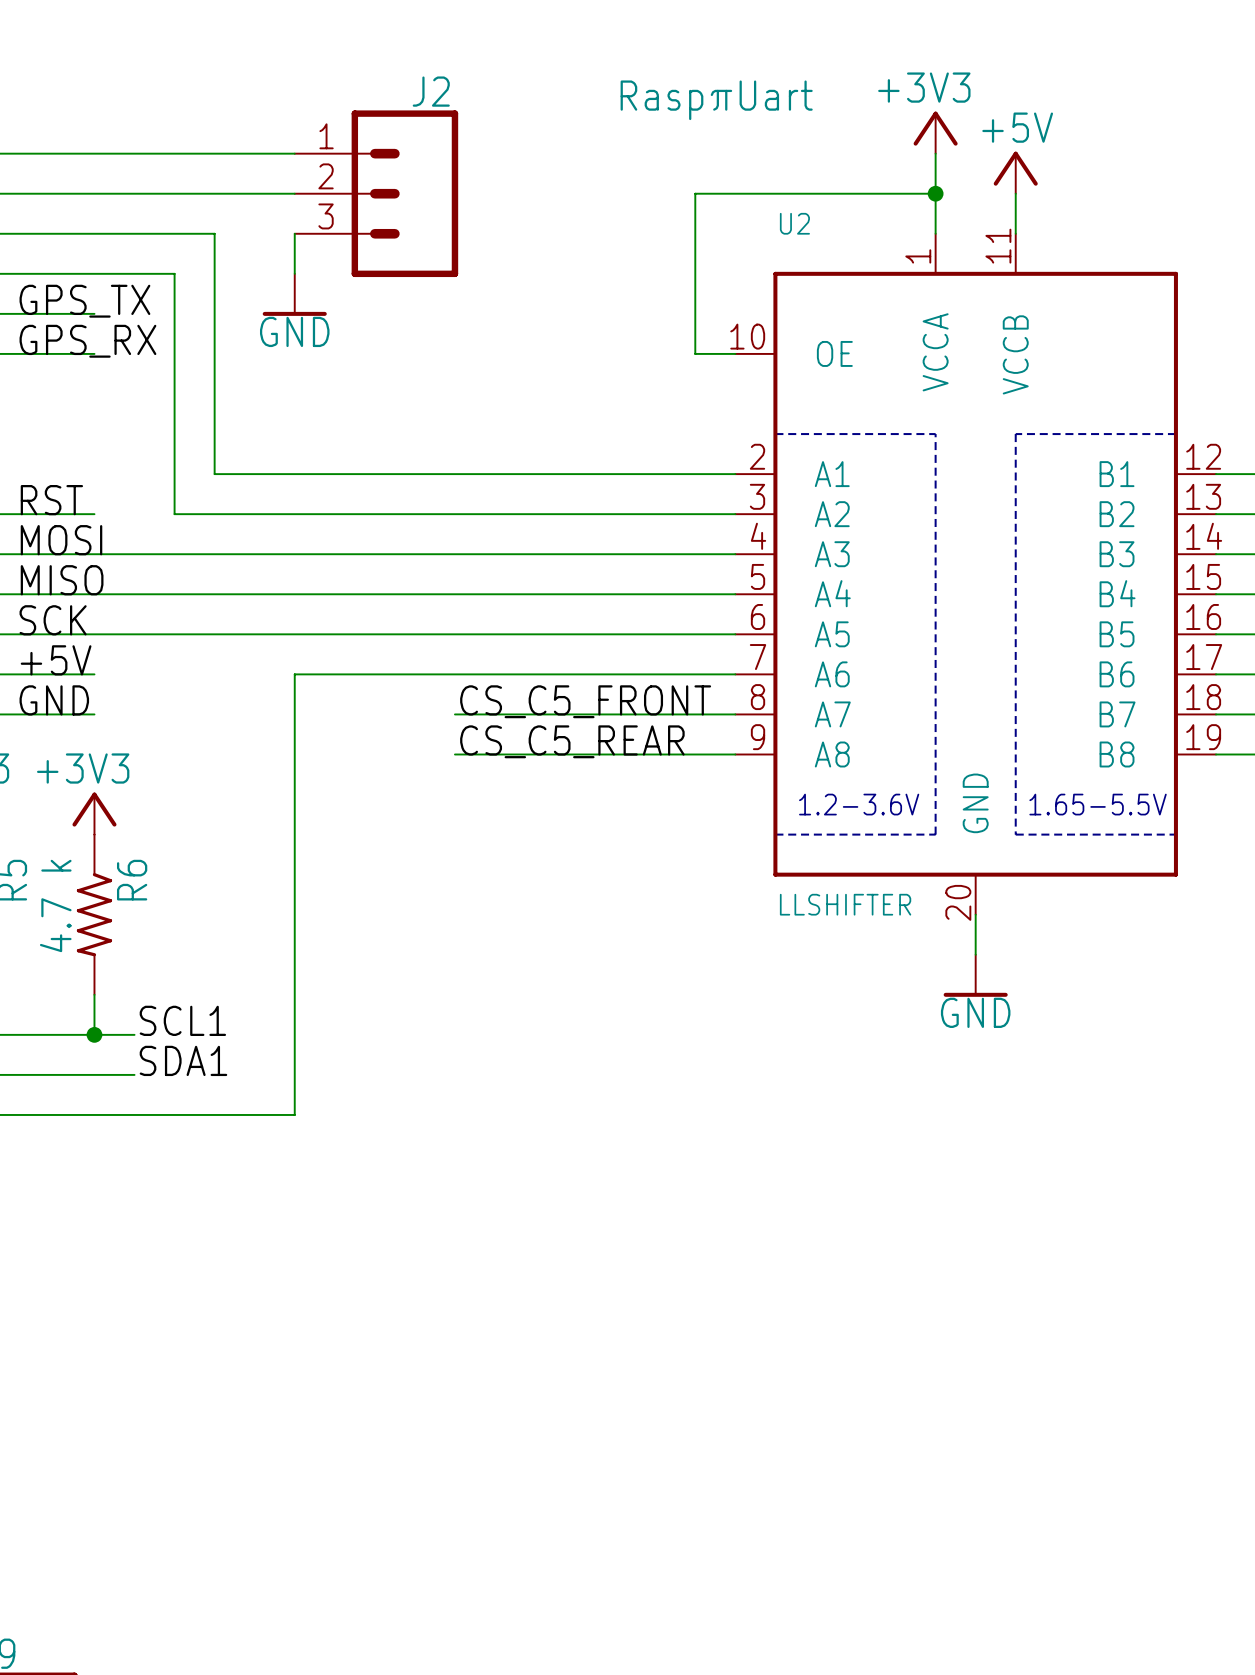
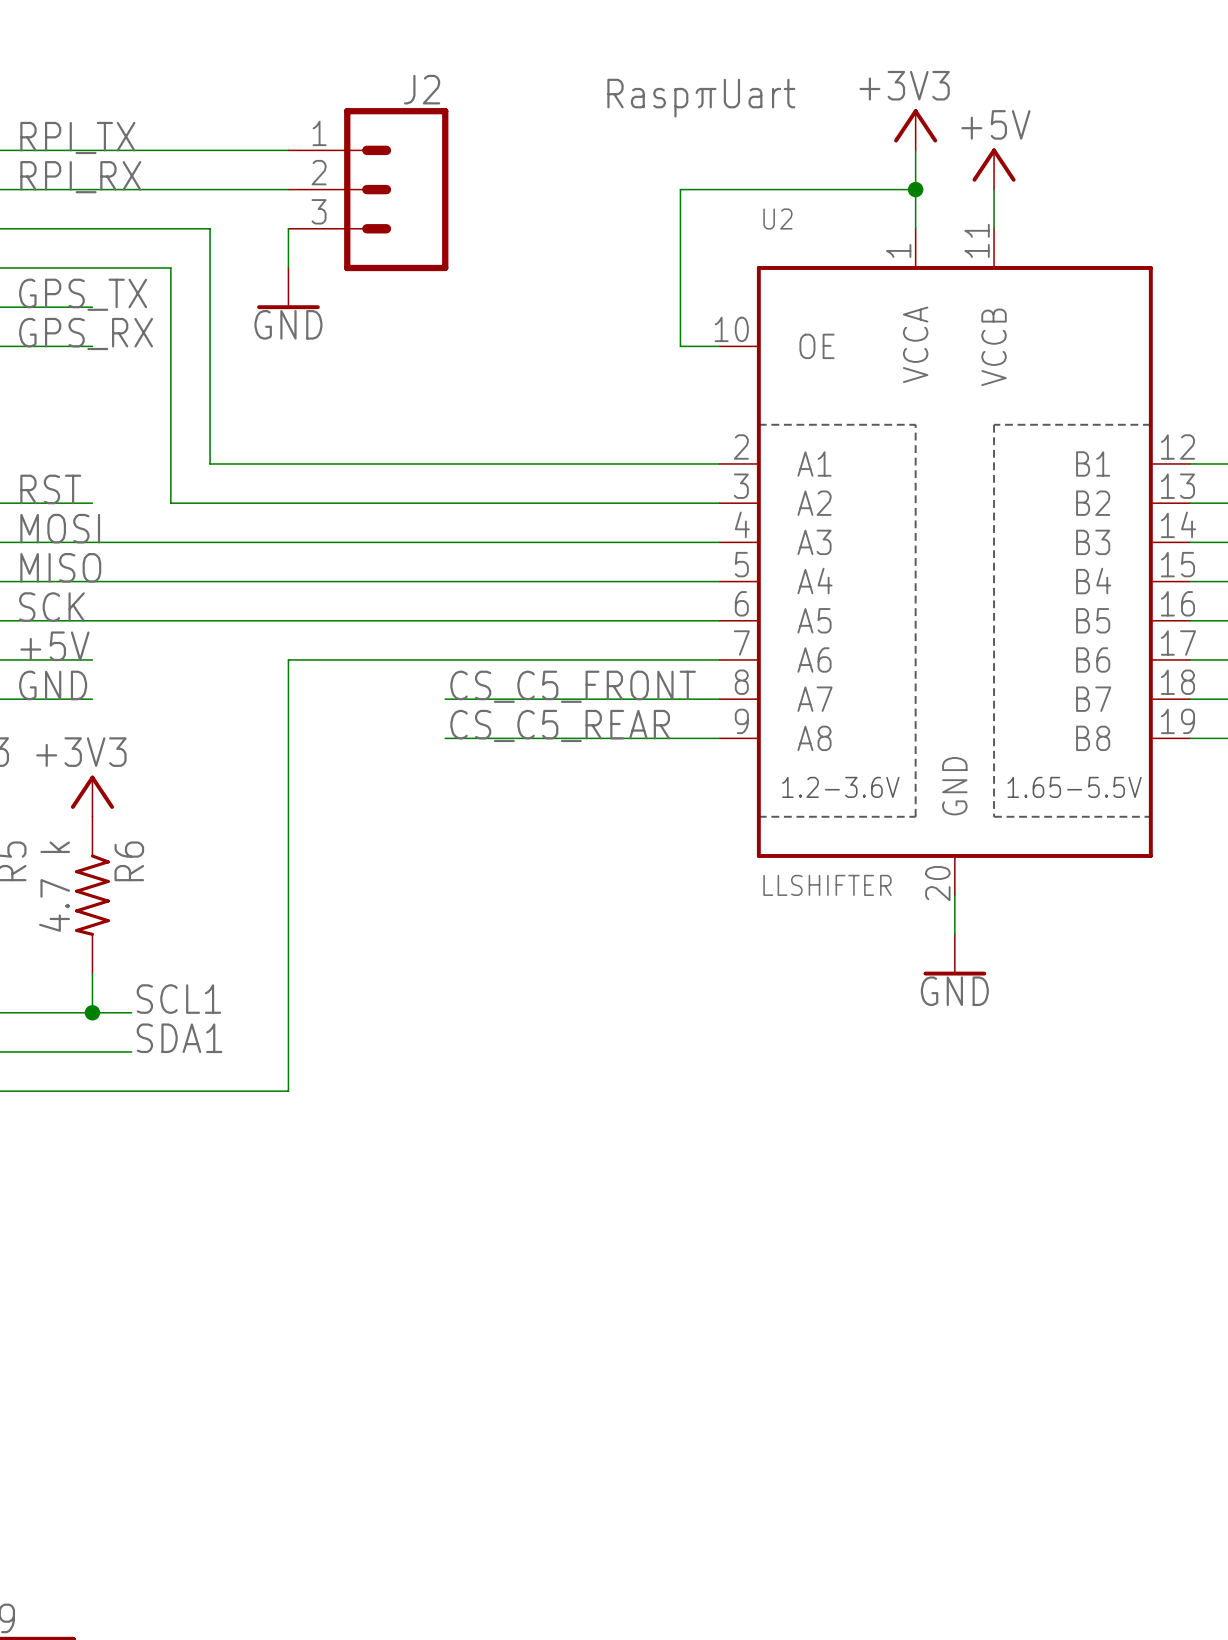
label: none -> RPI_TX (77, 137)
label: none -> RPI_RX (80, 177)

